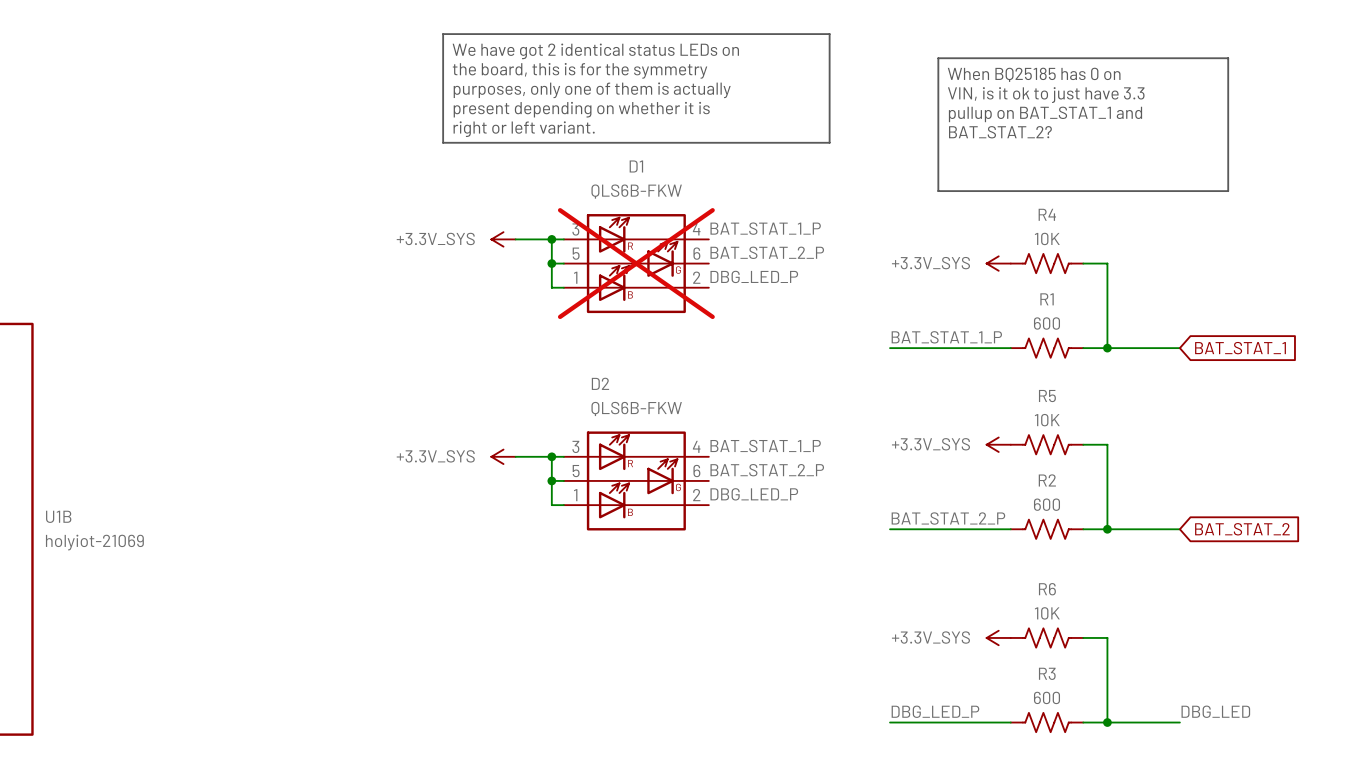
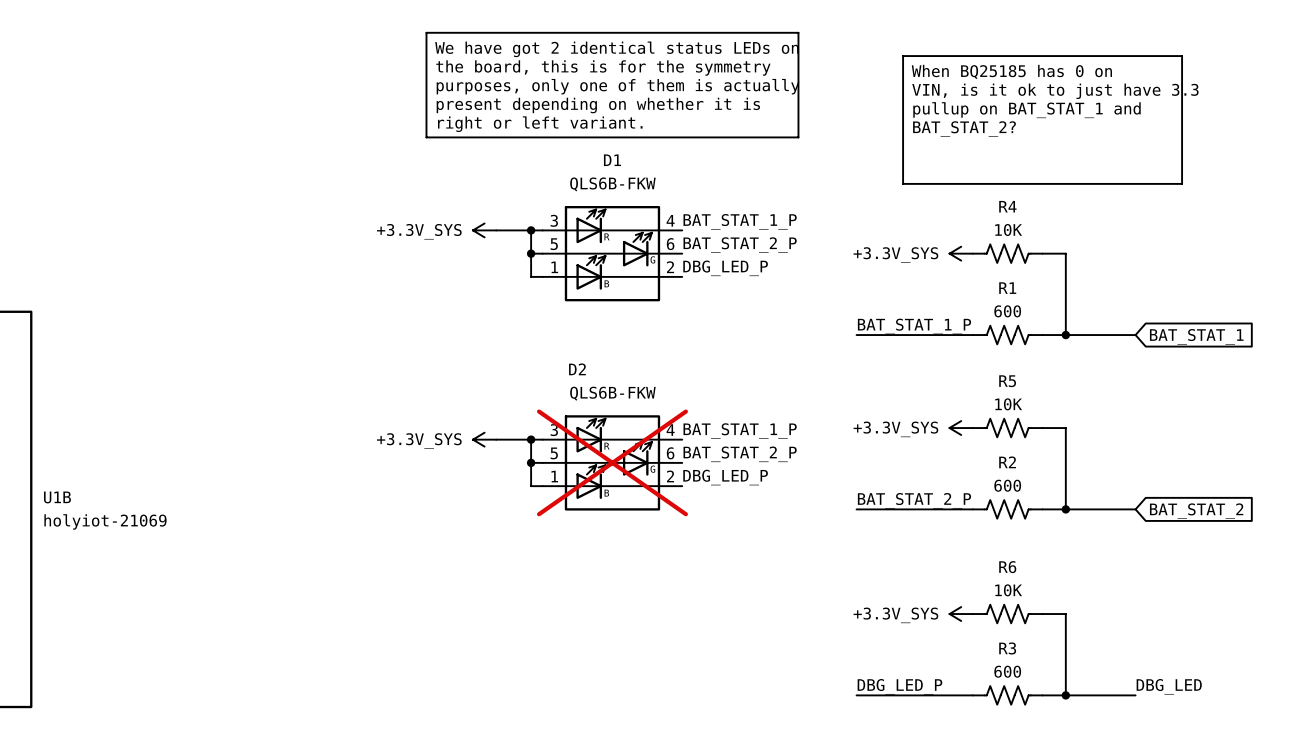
D1 do-not-place cross: (636, 263) -> none
D2 do-not-place cross: none -> (612, 462)

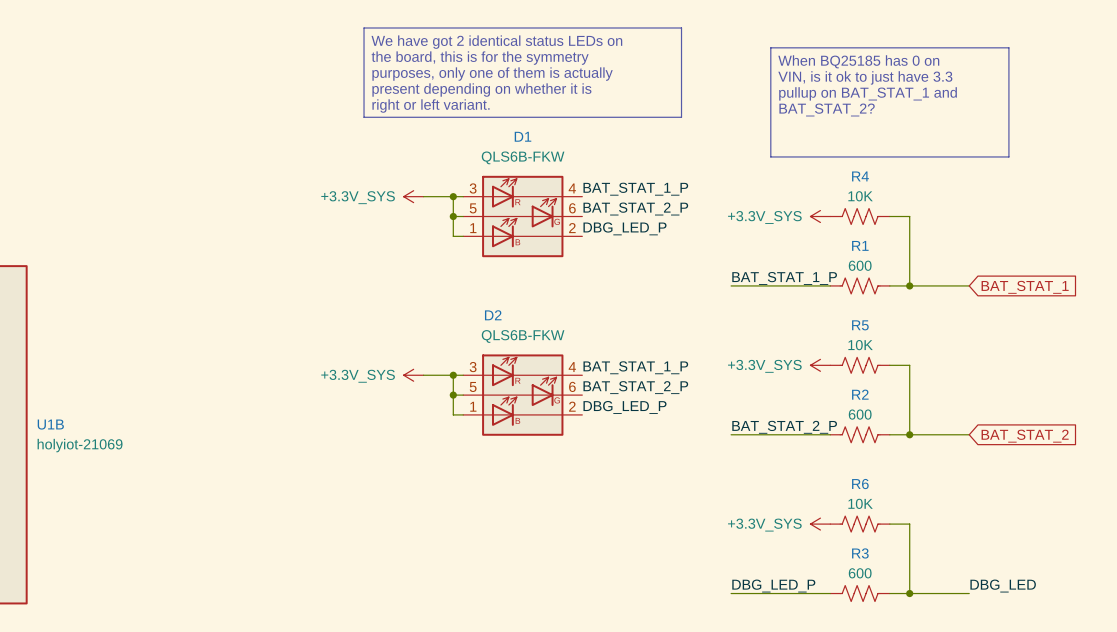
D2 do-not-place cross: (612, 462) -> none

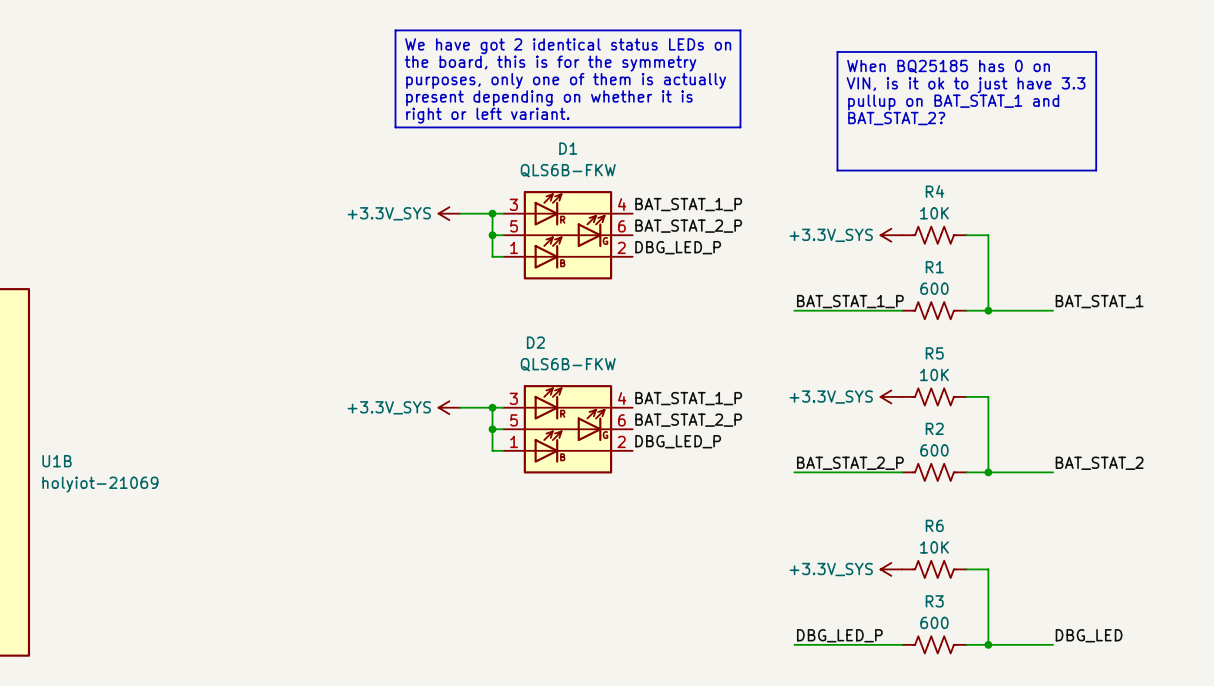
label: none -> BAT_STAT_1 (1099, 301)
global label: BAT_STAT_1 (1025, 287) -> none
label: none -> BAT_STAT_2 (1099, 463)
global label: BAT_STAT_2 (1025, 436) -> none

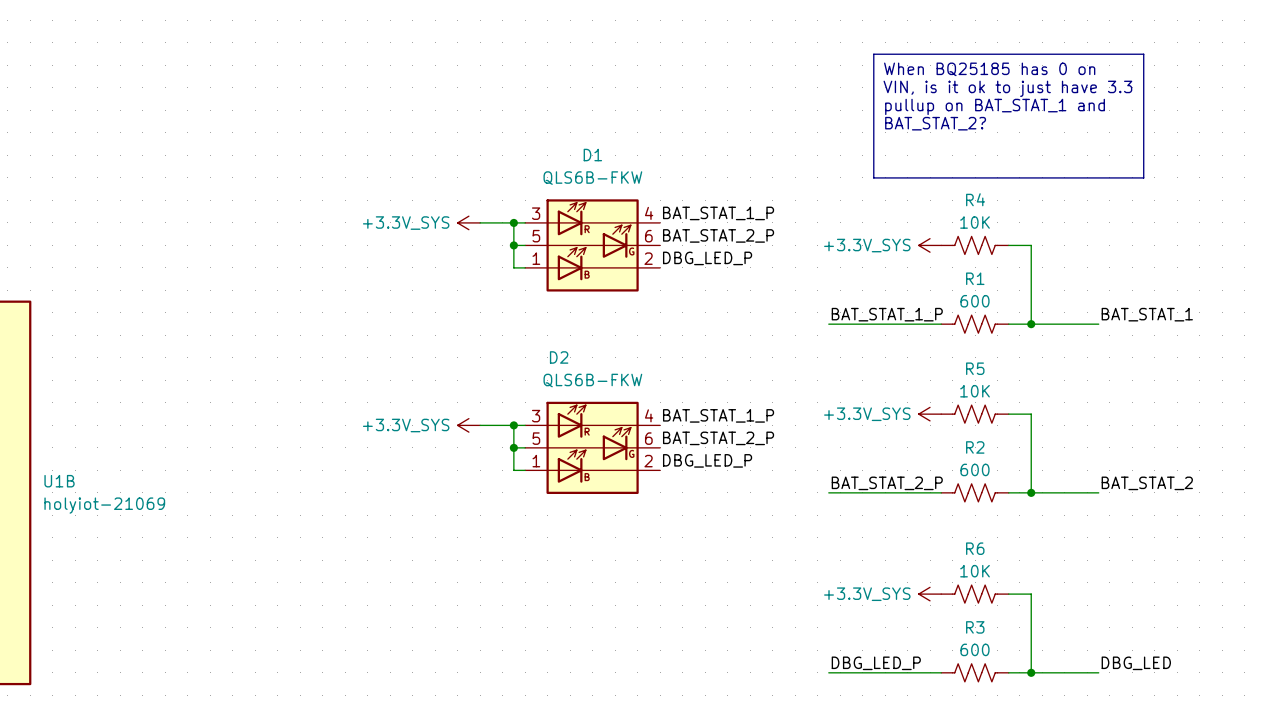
line: (395, 30) (740, 30) (740, 127) (395, 127) (395, 30) -> none
text: We have got 2 identical status LEDs on (568, 46) -> none
text: the board, this is for the symmetry (550, 63) -> none
text: purposes, only one of them is actually (566, 80) -> none
text: present depending on whether it is (549, 98) -> none
text: right or left variant. (487, 115) -> none

